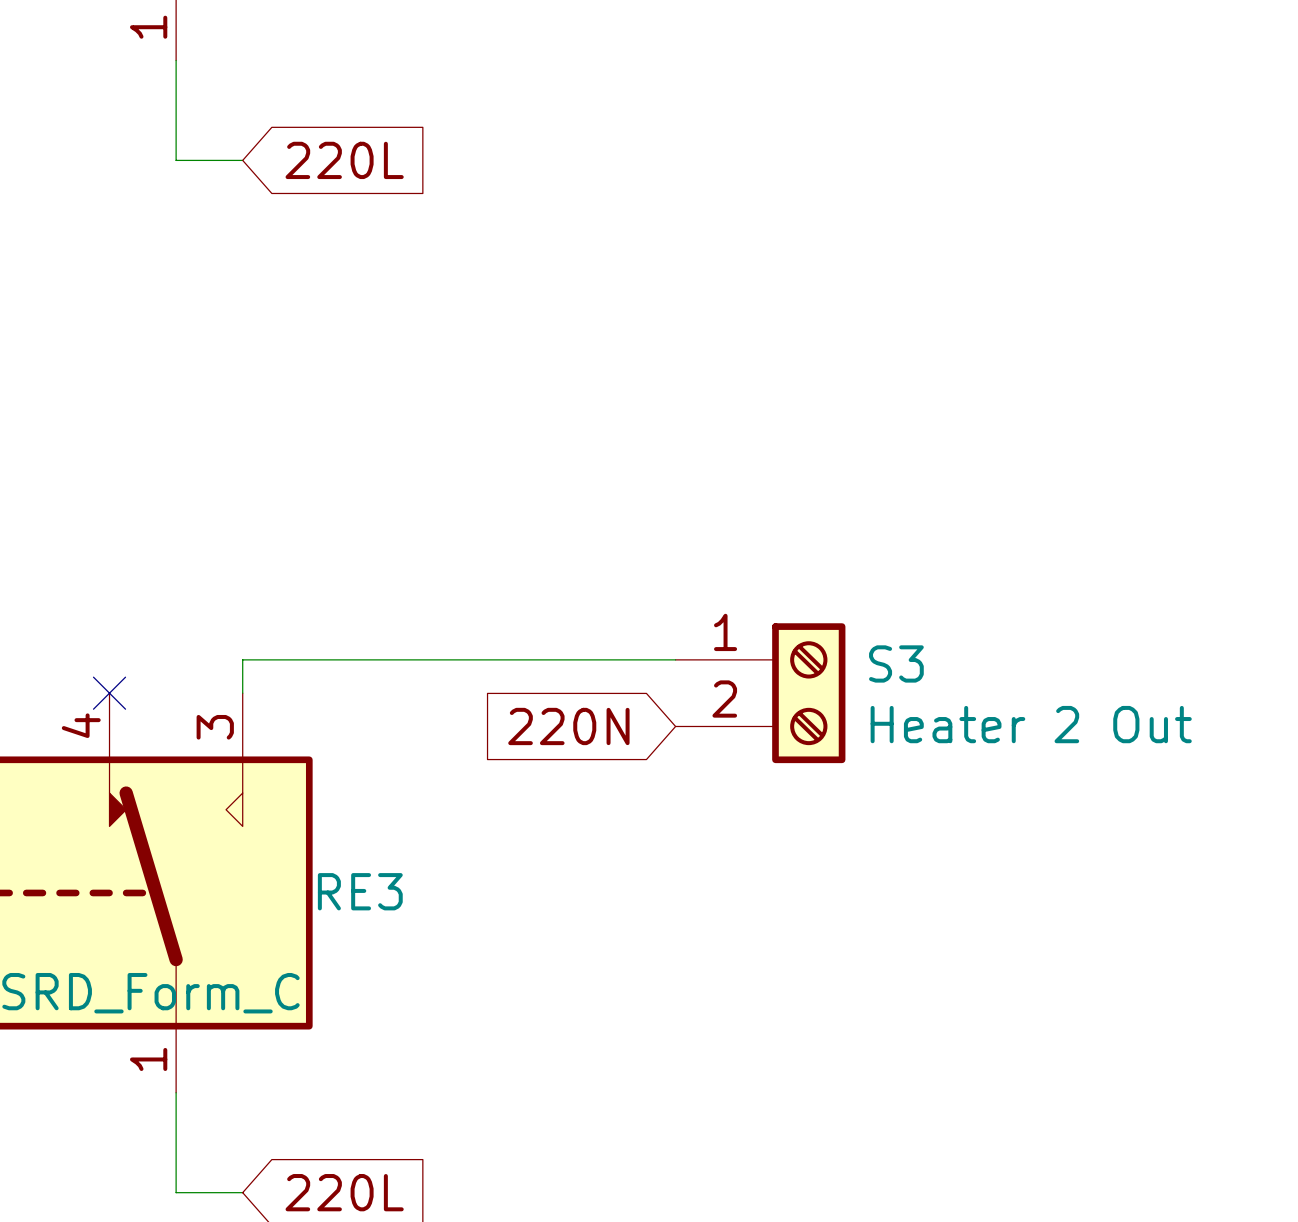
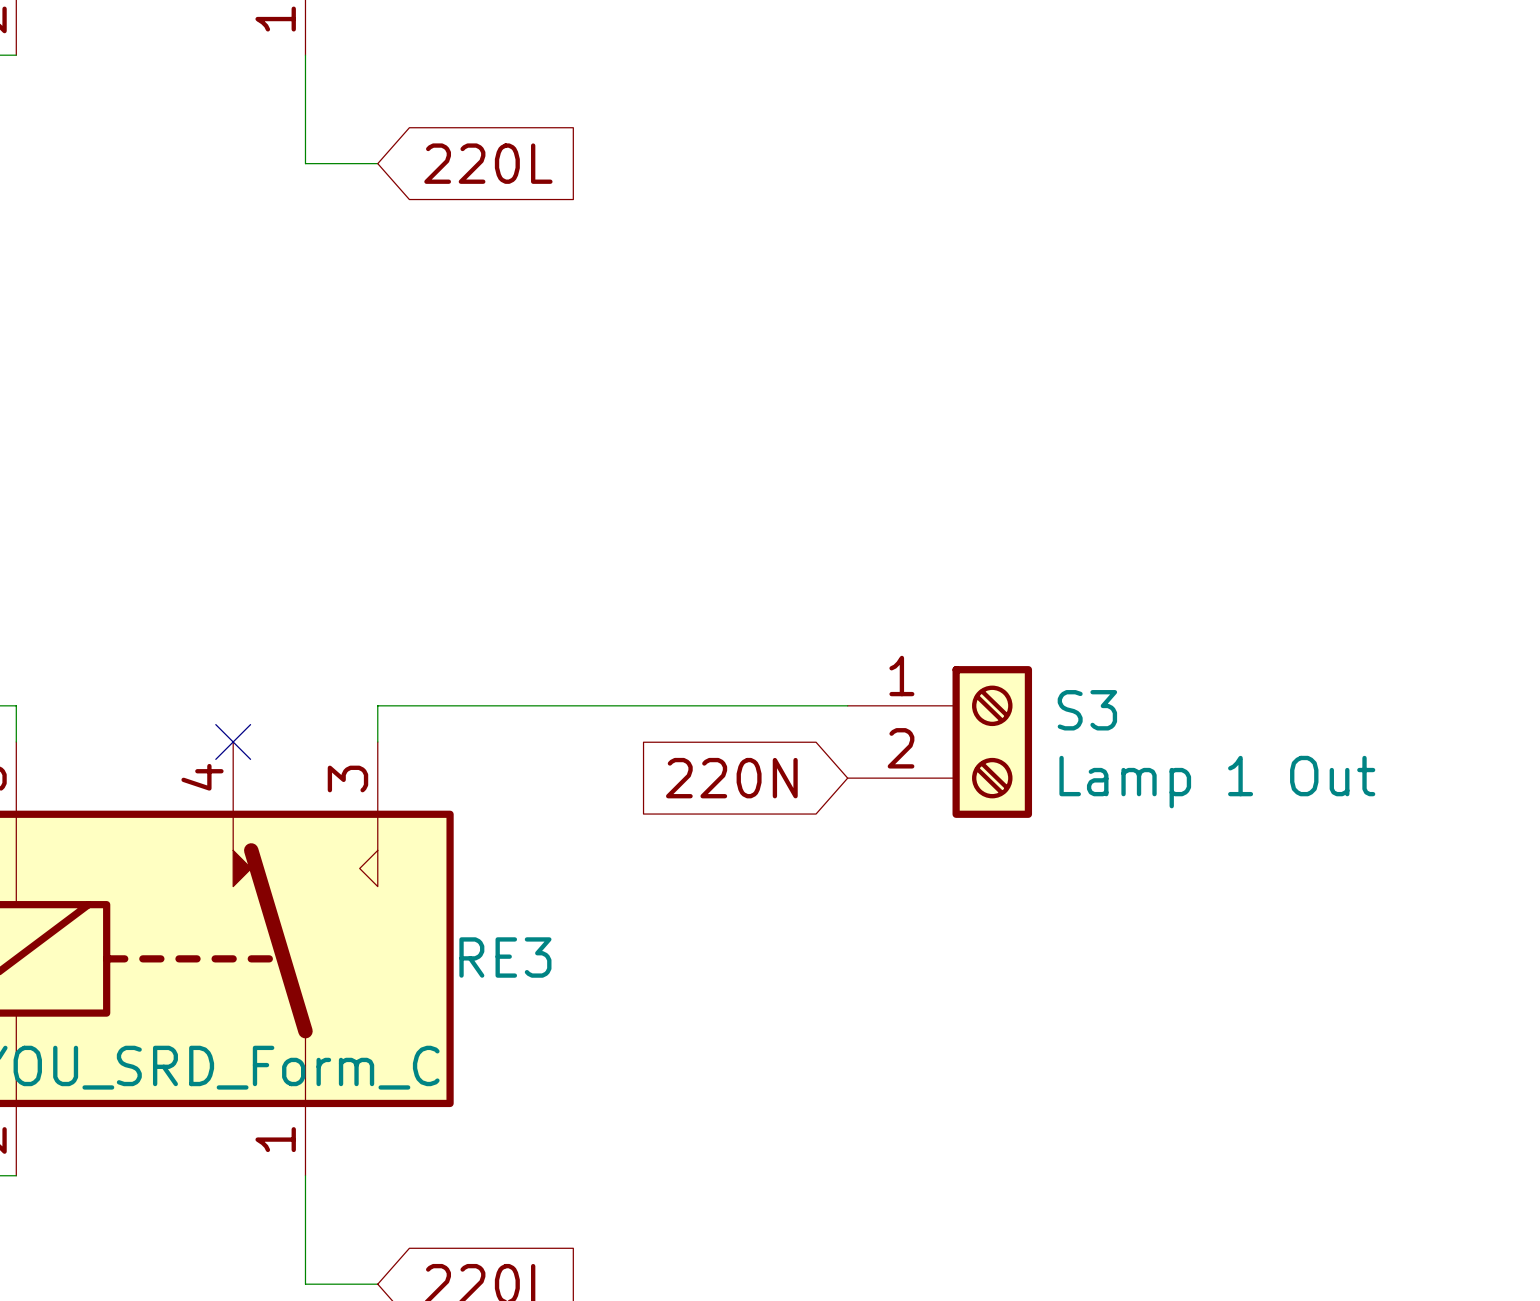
S3 value: Heater 2 Out (1031, 724) -> Lamp 1 Out (1217, 782)

